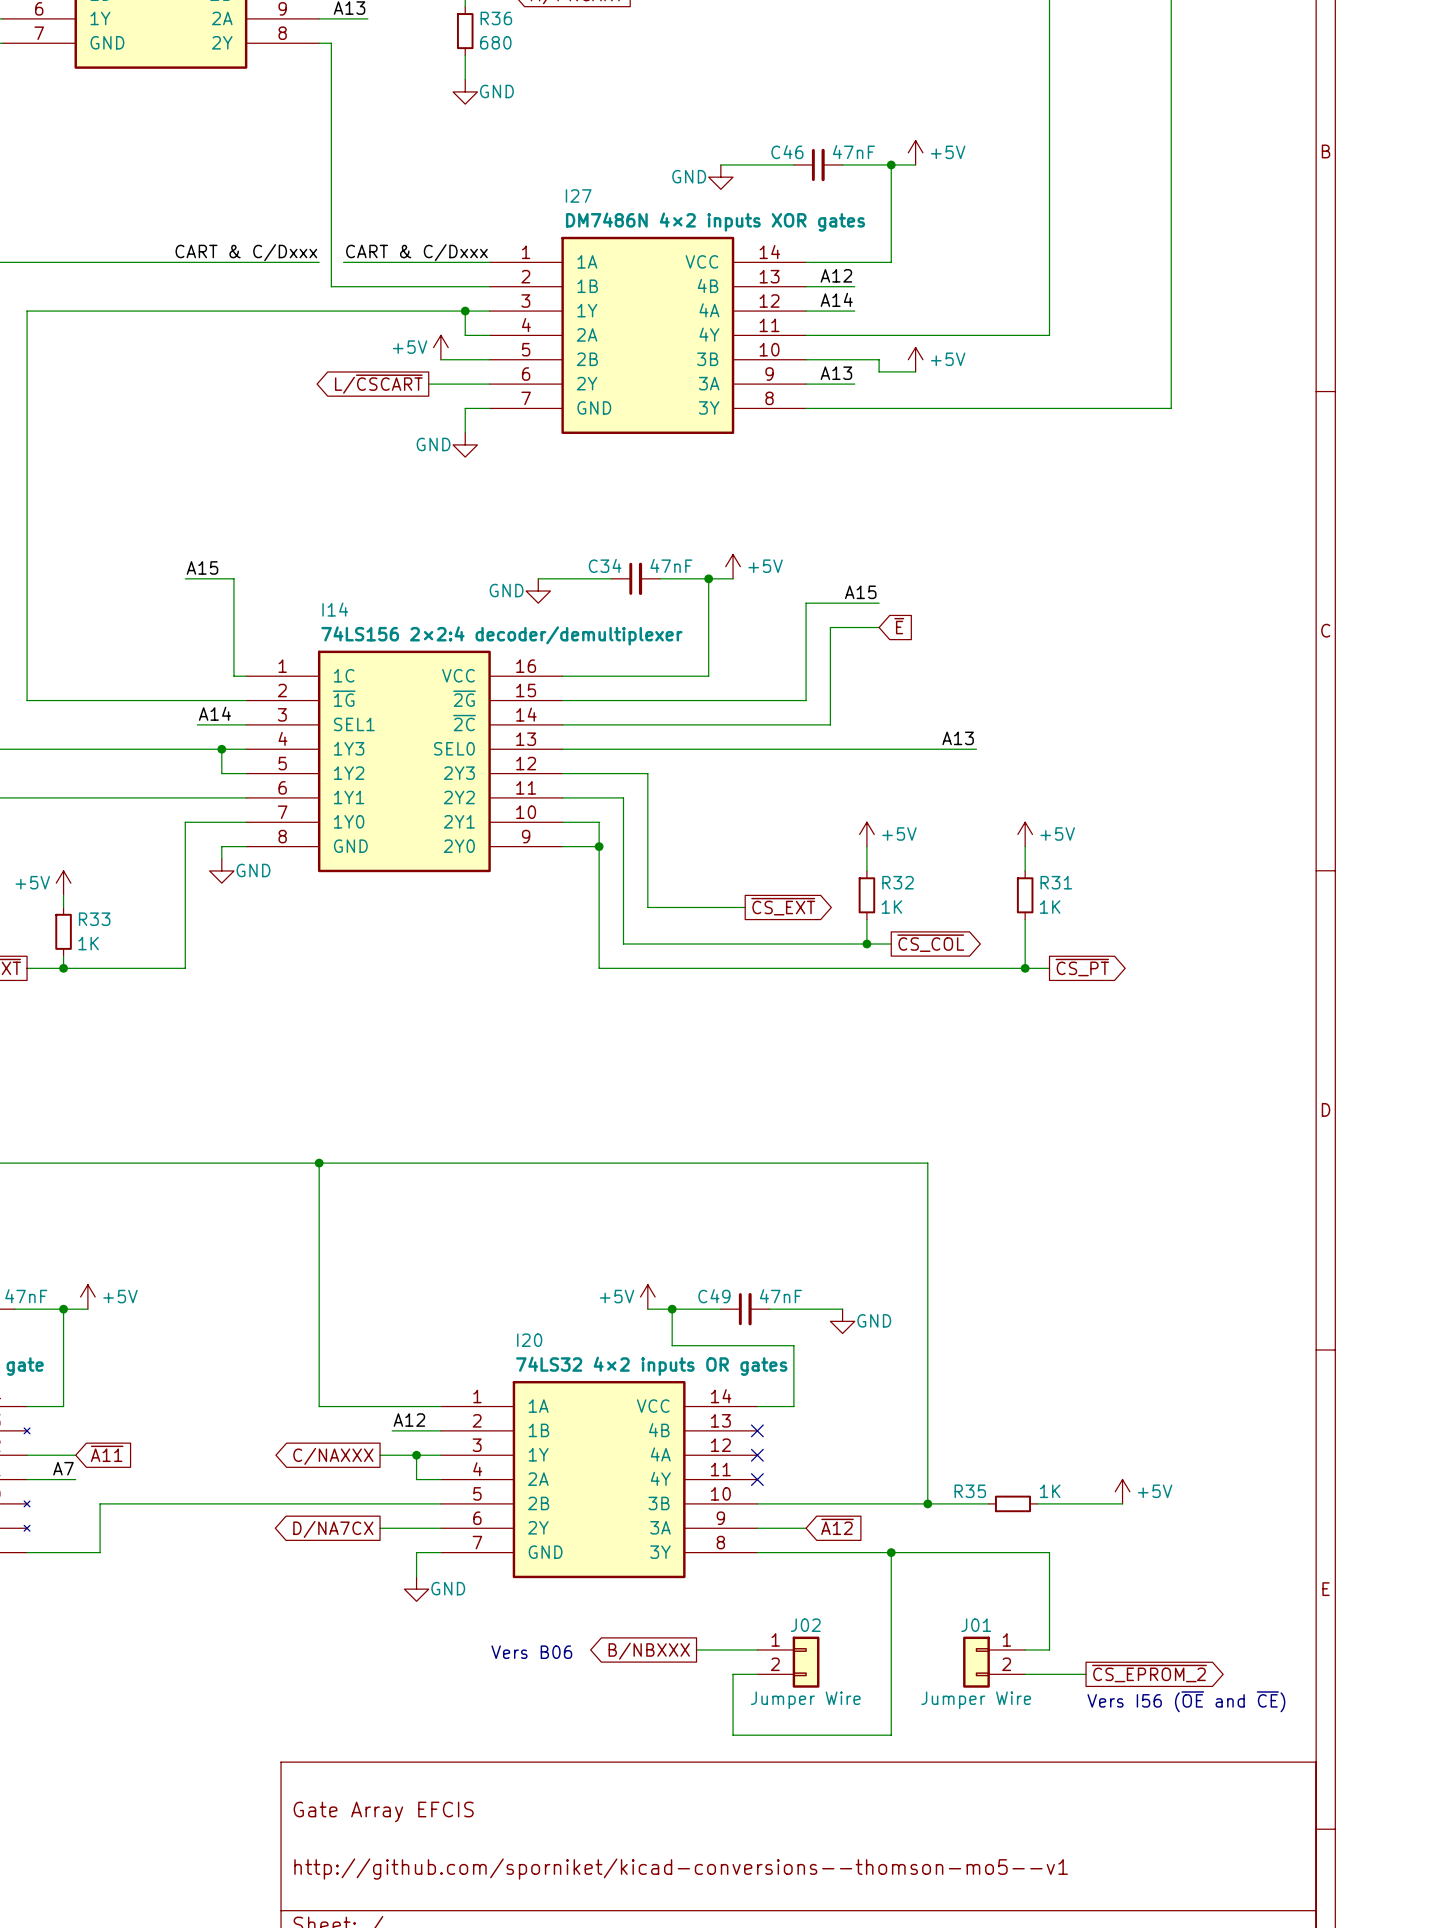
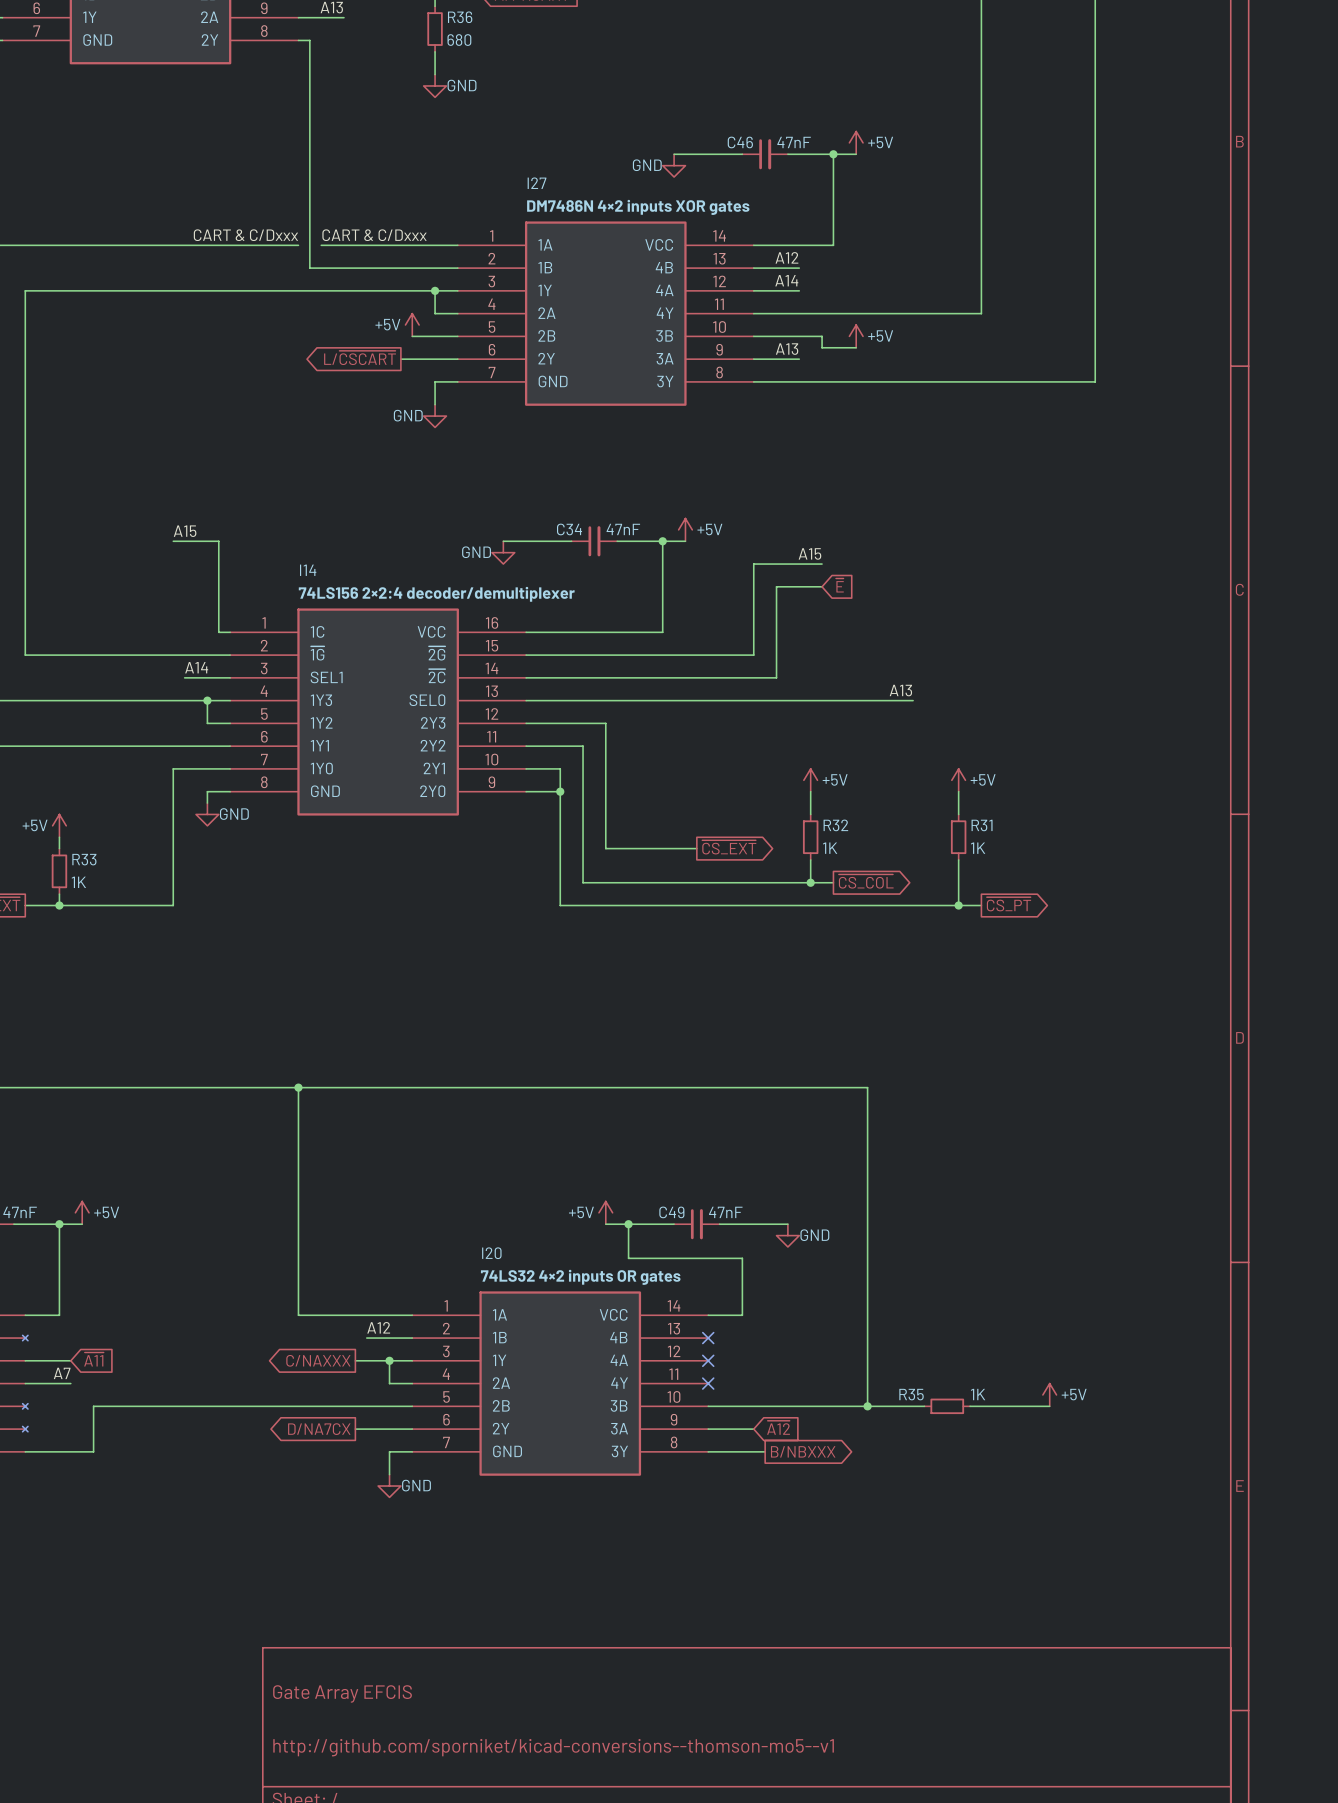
wire: (818, 1552) (1049, 1552) (1049, 1649) (1025, 1649) -> none
wire: (891, 1552) (891, 1735) (733, 1735) (733, 1674) (757, 1674) -> none
junction: (891, 1552) -> none
wire: (696, 1649) (757, 1649) -> none
global label rotation: 0° (649, 1651) -> 180° (803, 1451)
global label position: B/NBXXX (649, 1651) -> B/NBXXX (803, 1451)
text: Vers B06 (531, 1652) -> none
J02: Jumper Wire (788, 1662) -> none
J01: Jumper Wire (994, 1662) -> none
global label: ~{CS_EPROM_2} (1149, 1673) -> none
wire: (1025, 1674) (1086, 1674) -> none
text: Vers I56 (~{OE} and ~{CE}) (1186, 1701) -> none

